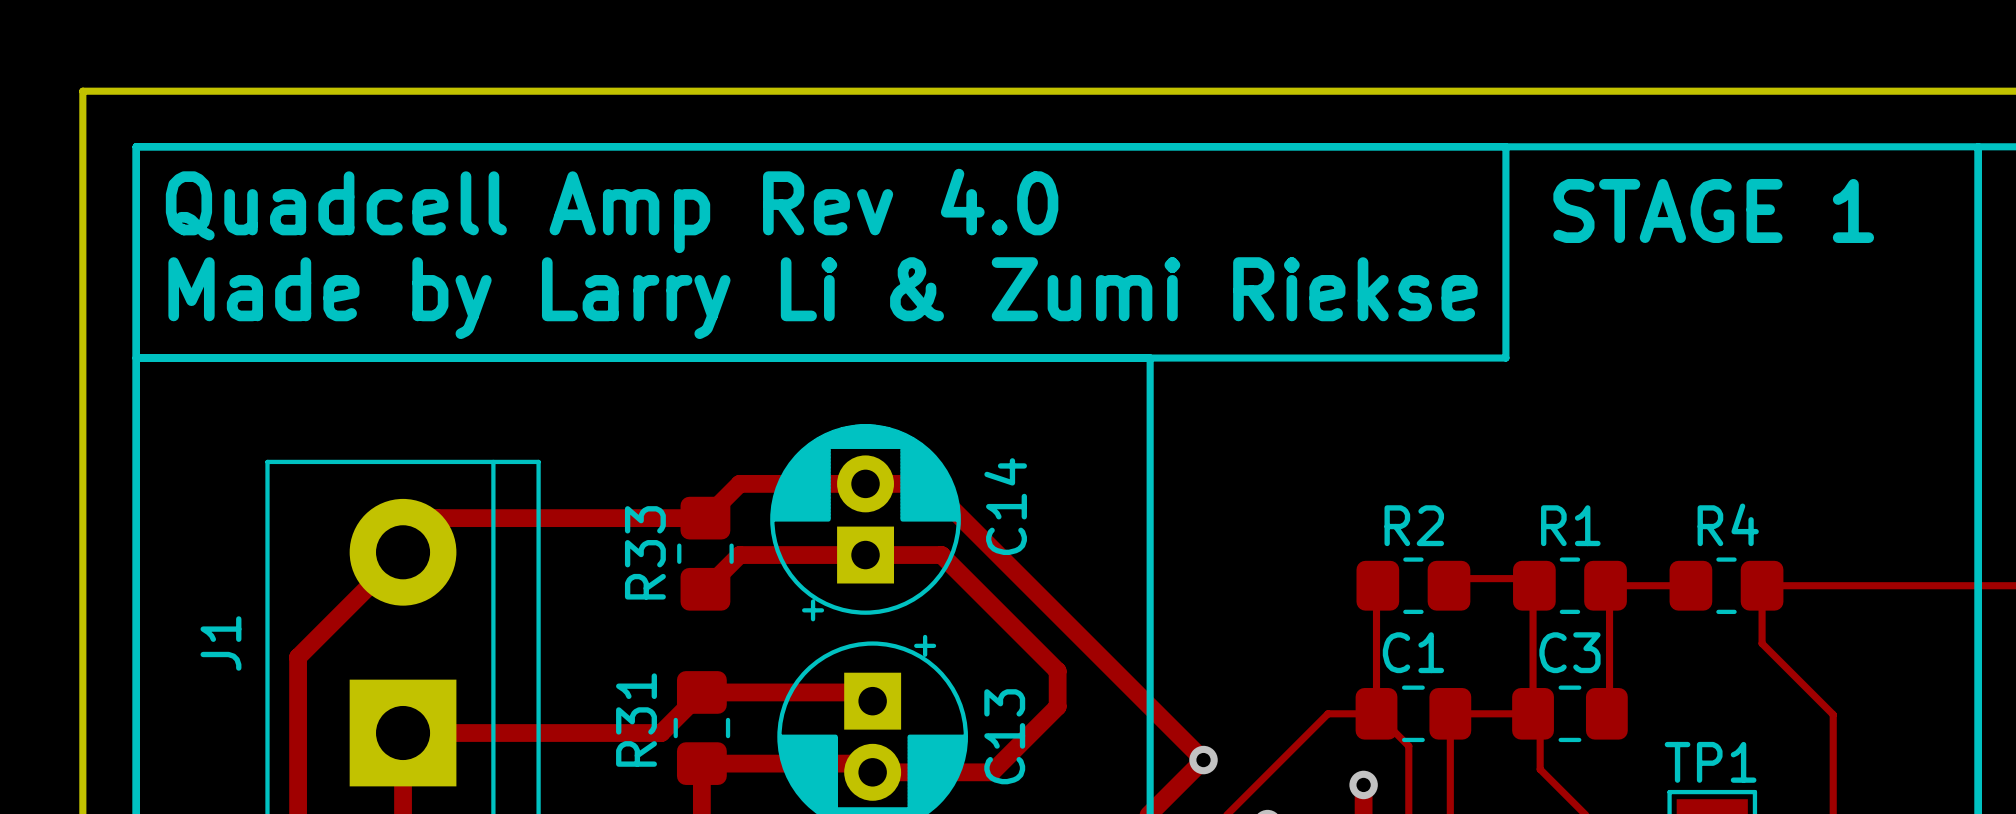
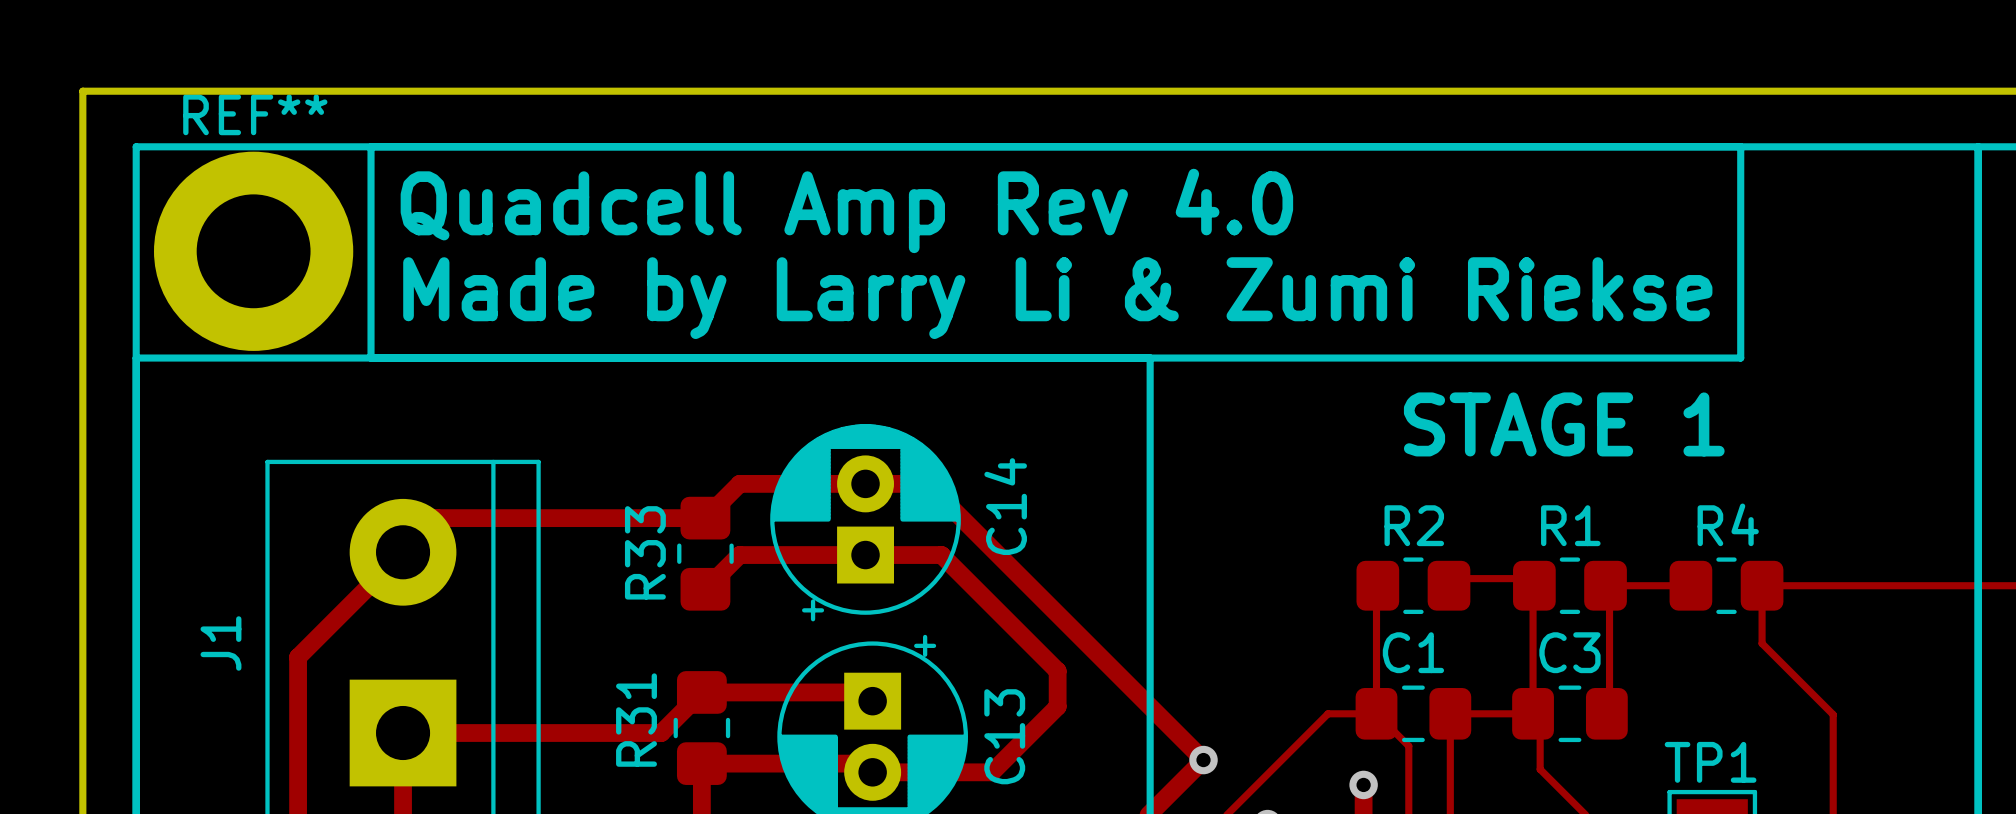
line: none -> (371, 146) (371, 358)
line: (1505, 146) (1505, 358) -> (1740, 146) (1740, 358) (1505, 358)
text position: Quadcell Amp Rev 4.0 (612, 210) -> Quadcell Amp Rev 4.0 (846, 210)
text position: STAGE 1 (1713, 210) -> STAGE 1 (1564, 424)
REF**: none -> (253, 251)
text position: Made by Larry Li & Zumi Riekse (823, 298) -> Made by Larry Li & Zumi Riekse (1057, 298)

